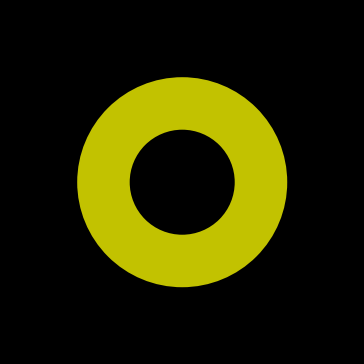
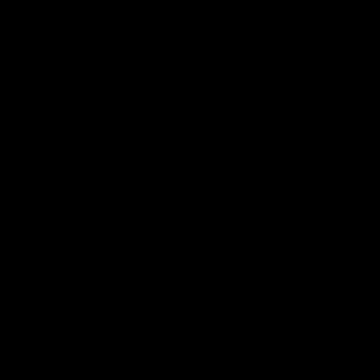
part: (182, 182) -> none

